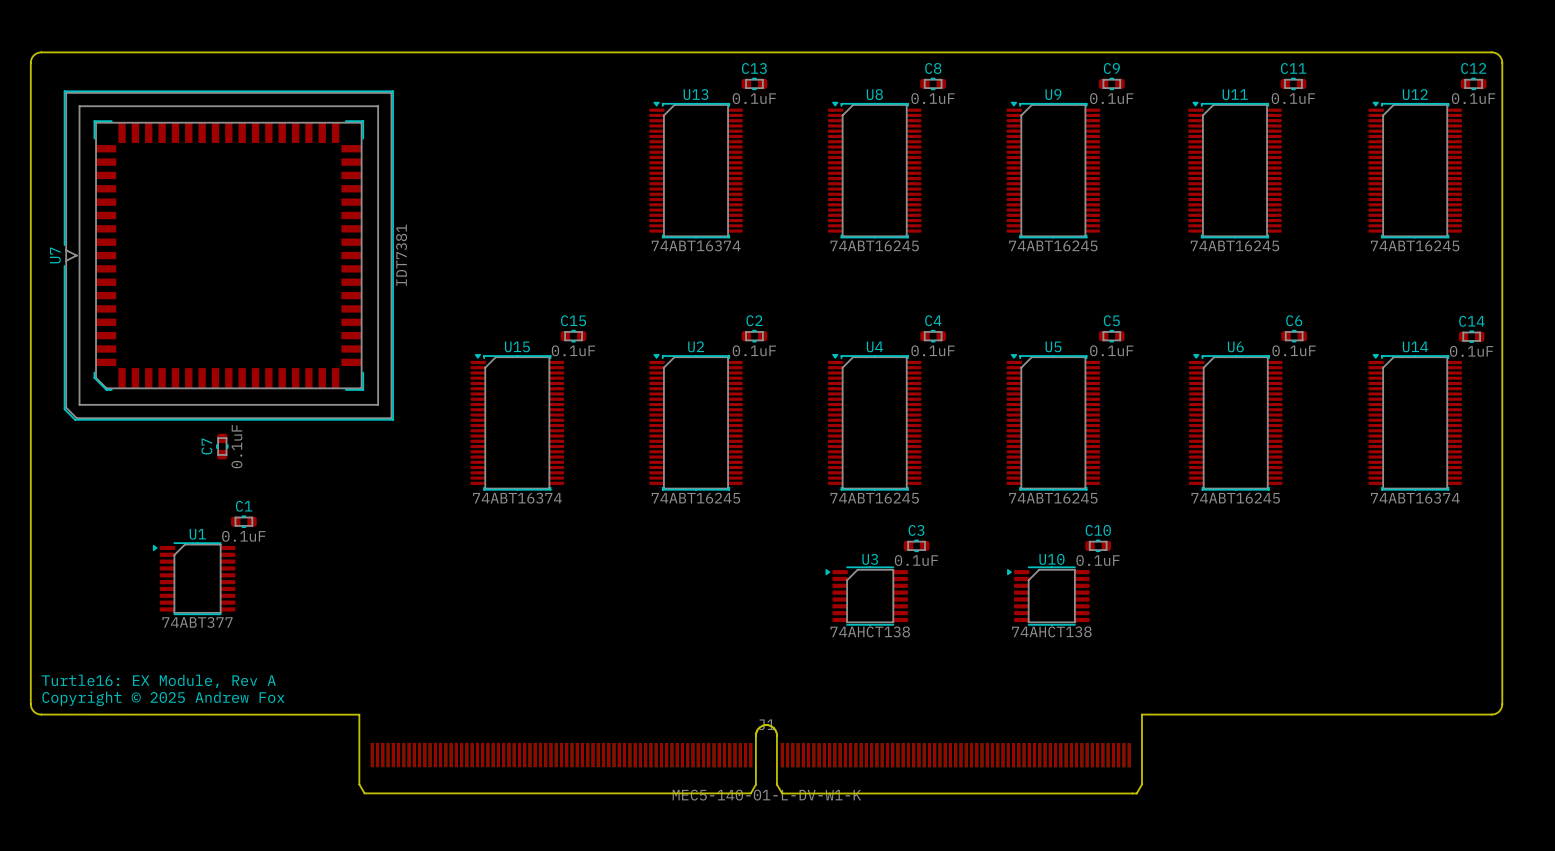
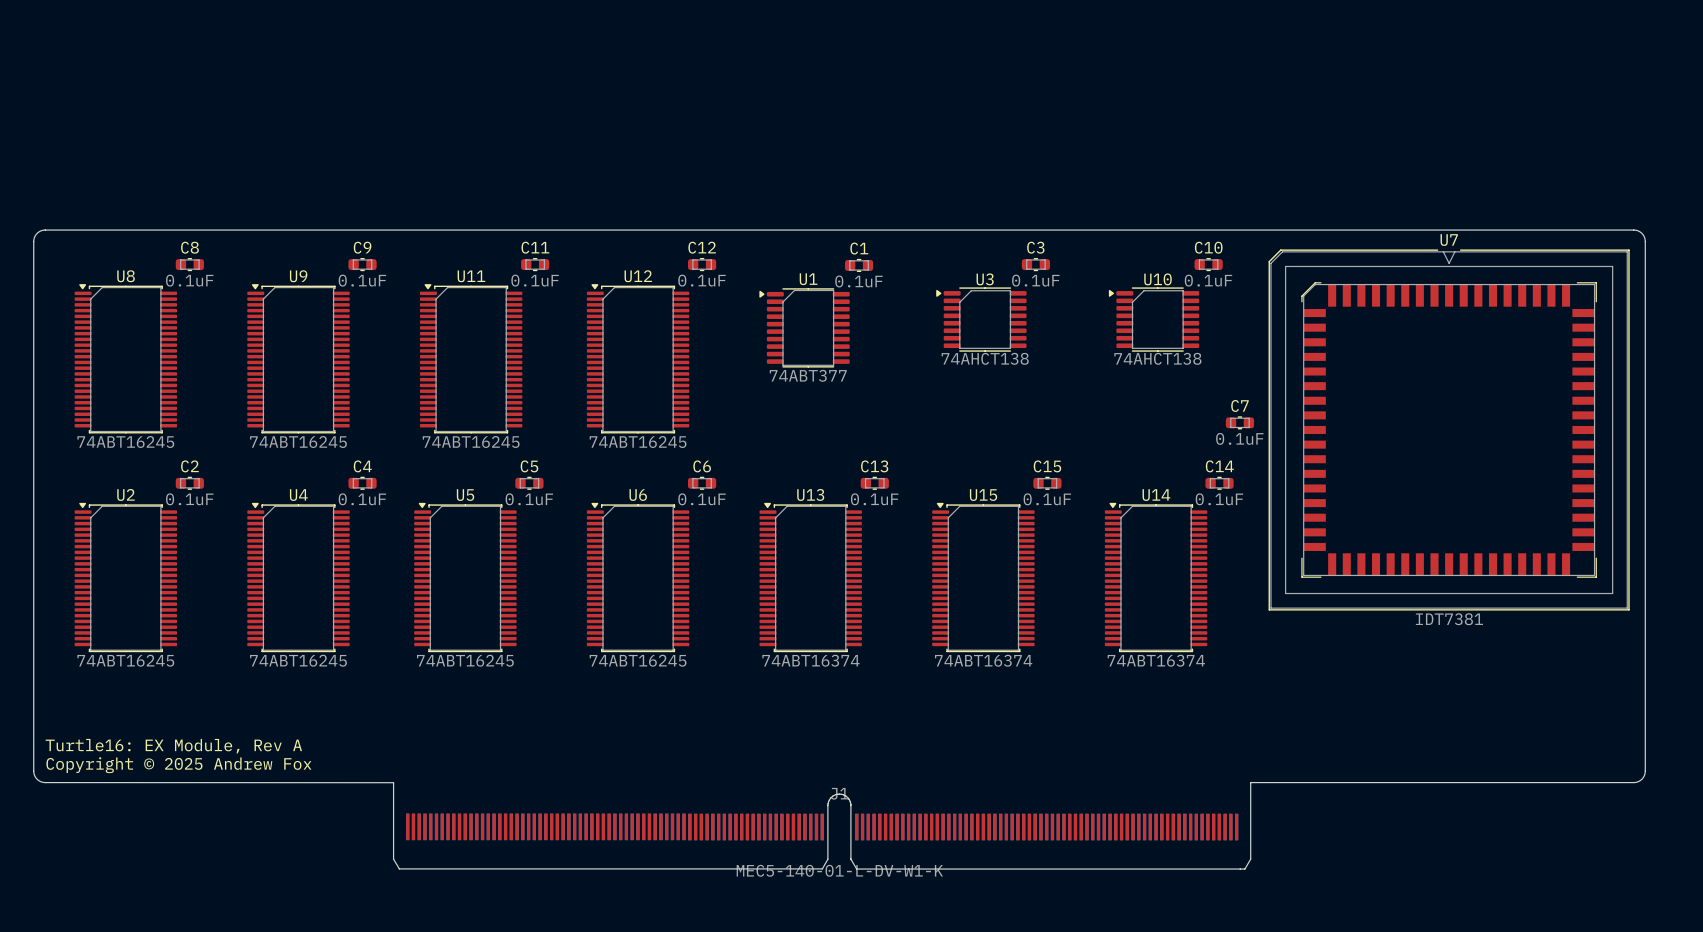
C13 position: (754, 83) -> (874, 483)
C8 position: (933, 83) -> (189, 264)
C9 position: (1111, 83) -> (362, 264)
C11 position: (1293, 83) -> (535, 264)
C12 position: (1473, 83) -> (702, 264)
U13 position: (696, 169) -> (810, 577)
U8 position: (874, 169) -> (125, 358)
U9 position: (1053, 169) -> (298, 358)
U11 position: (1234, 169) -> (471, 358)
U12 position: (1415, 169) -> (638, 358)
board edge: (30, 220) (30, 61) (33, 55) (41, 52) (1492, 52) (1499, 55) (1502, 62) (1502, 220) -> (33, 241) (37, 233) (45, 230) (1633, 230) (1641, 233) (1645, 241)
U7 rotation: 0° (228, 255) -> 90° clockwise (1449, 429)
U7 position: (228, 255) -> (1449, 429)
C15 position: (573, 336) -> (1047, 483)
C2 position: (754, 336) -> (189, 483)
C4 position: (933, 336) -> (362, 483)
C5 position: (1111, 336) -> (529, 483)
C6 position: (1294, 336) -> (702, 483)
C14 position: (1471, 336) -> (1219, 483)
U15 position: (517, 422) -> (983, 577)
U2 position: (696, 422) -> (125, 577)
U4 position: (874, 422) -> (298, 577)
U5 position: (1053, 422) -> (465, 577)
U6 position: (1235, 422) -> (638, 577)
U14 position: (1415, 422) -> (1156, 577)
C7 rotation: 0° (222, 446) -> 90° clockwise (1239, 422)
C7 position: (222, 446) -> (1239, 422)
C1 position: (243, 521) -> (859, 265)
C3 position: (916, 545) -> (1035, 264)
C10 position: (1098, 545) -> (1208, 264)
U1 position: (194, 578) -> (804, 327)
U3 position: (866, 596) -> (981, 319)
U10 position: (1048, 596) -> (1154, 319)

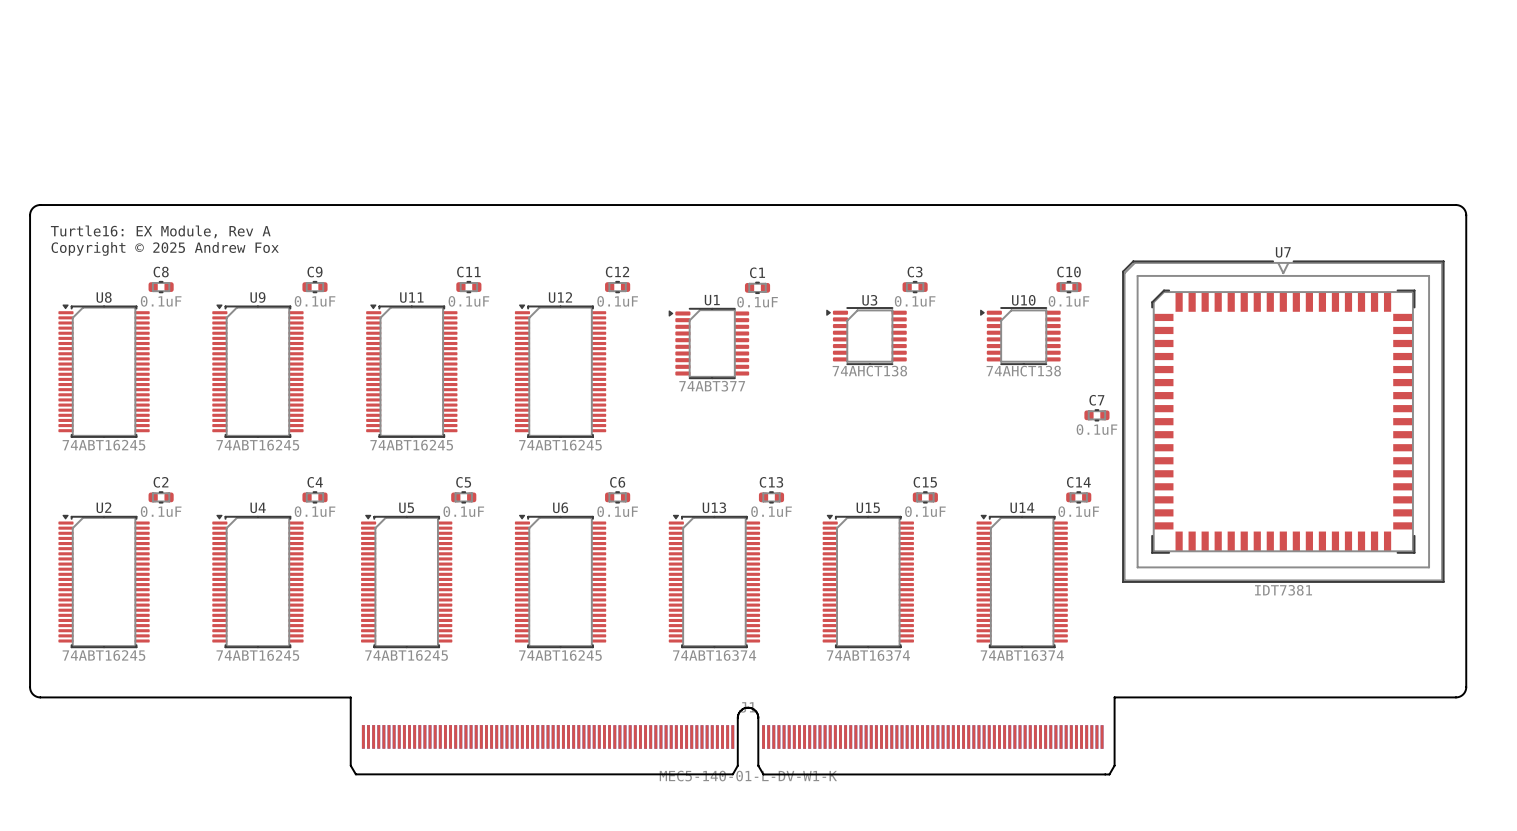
text: none -> Turtle16: EX Module, Rev A (160, 231)
C8 position: (189, 264) -> (161, 287)
C9 position: (362, 264) -> (314, 287)
C11 position: (535, 264) -> (468, 287)
C12 position: (702, 264) -> (617, 287)
C3 position: (1035, 264) -> (915, 287)
C10 position: (1208, 264) -> (1068, 287)
C1 position: (859, 265) -> (757, 287)
text: none -> Copyright © 2025 Andrew Fox (165, 248)
U3 position: (981, 319) -> (866, 336)
U10 position: (1154, 319) -> (1020, 336)
U1 position: (804, 327) -> (708, 343)
U8 position: (125, 358) -> (104, 371)
U9 position: (298, 358) -> (257, 371)
U11 position: (471, 358) -> (411, 371)
U12 position: (638, 358) -> (560, 371)
C7 position: (1239, 422) -> (1096, 415)
U7 position: (1449, 429) -> (1283, 421)
C2 position: (189, 483) -> (161, 497)
C4 position: (362, 483) -> (314, 497)
C5 position: (529, 483) -> (463, 497)
C6 position: (702, 483) -> (617, 497)
C13 position: (874, 483) -> (771, 497)
C15 position: (1047, 483) -> (925, 497)
C14 position: (1219, 483) -> (1078, 497)
U2 position: (125, 577) -> (104, 581)
U4 position: (298, 577) -> (257, 581)
U5 position: (465, 577) -> (406, 581)
U6 position: (638, 577) -> (560, 581)
U13 position: (810, 577) -> (714, 581)
U15 position: (983, 577) -> (868, 581)
U14 position: (1156, 577) -> (1022, 581)
text: Turtle16: EX Module, Rev A (173, 746) -> none
text: Copyright © 2025 Andrew Fox (178, 765) -> none

